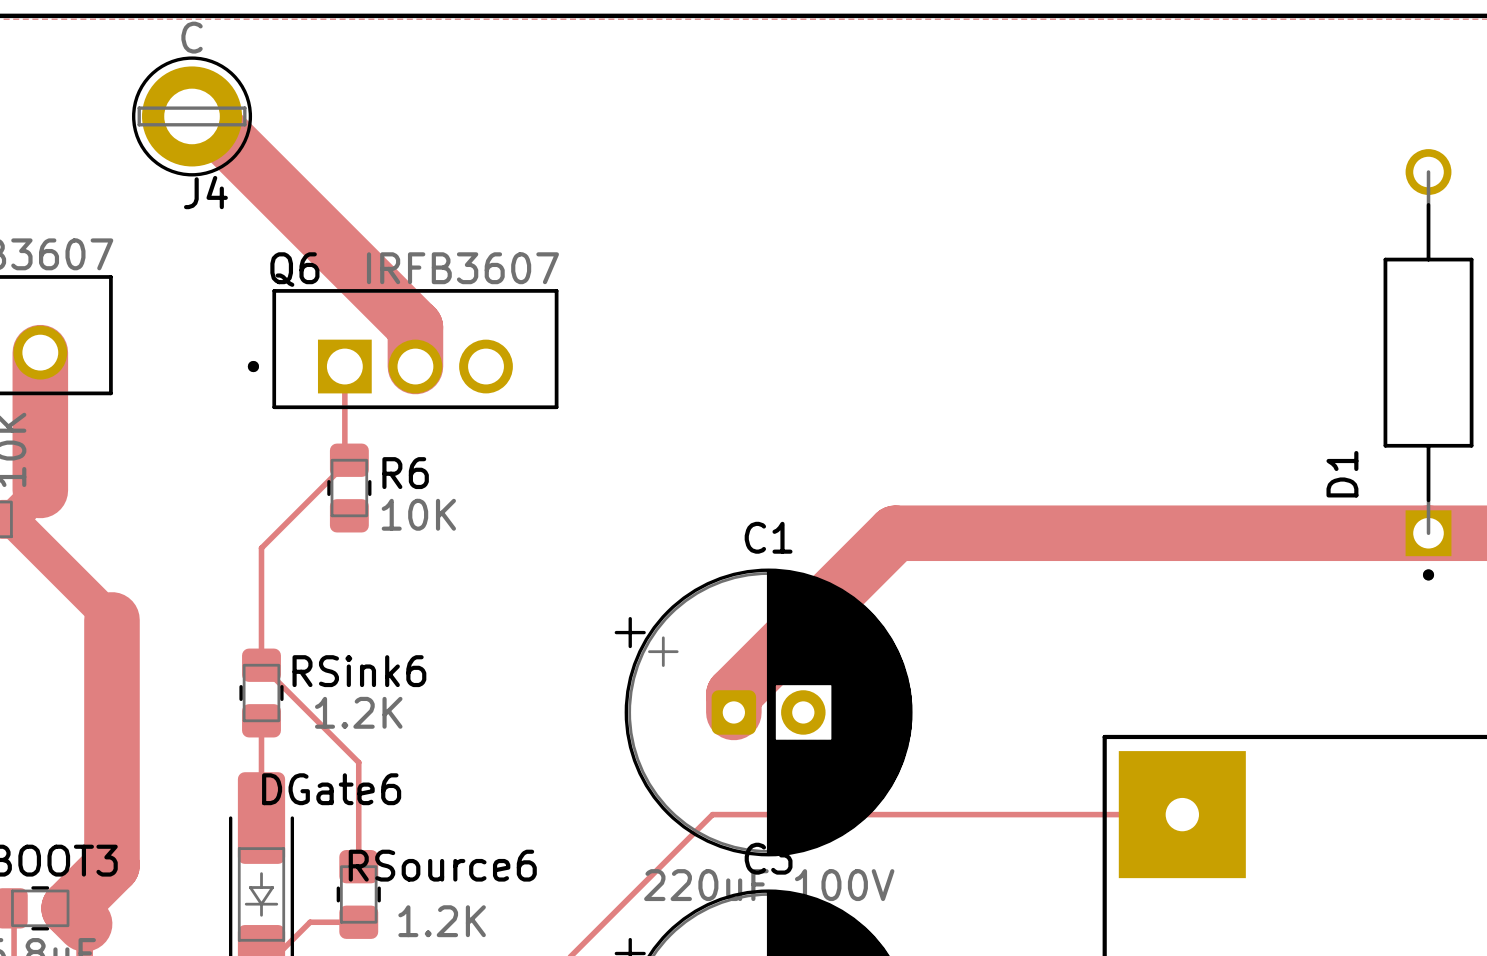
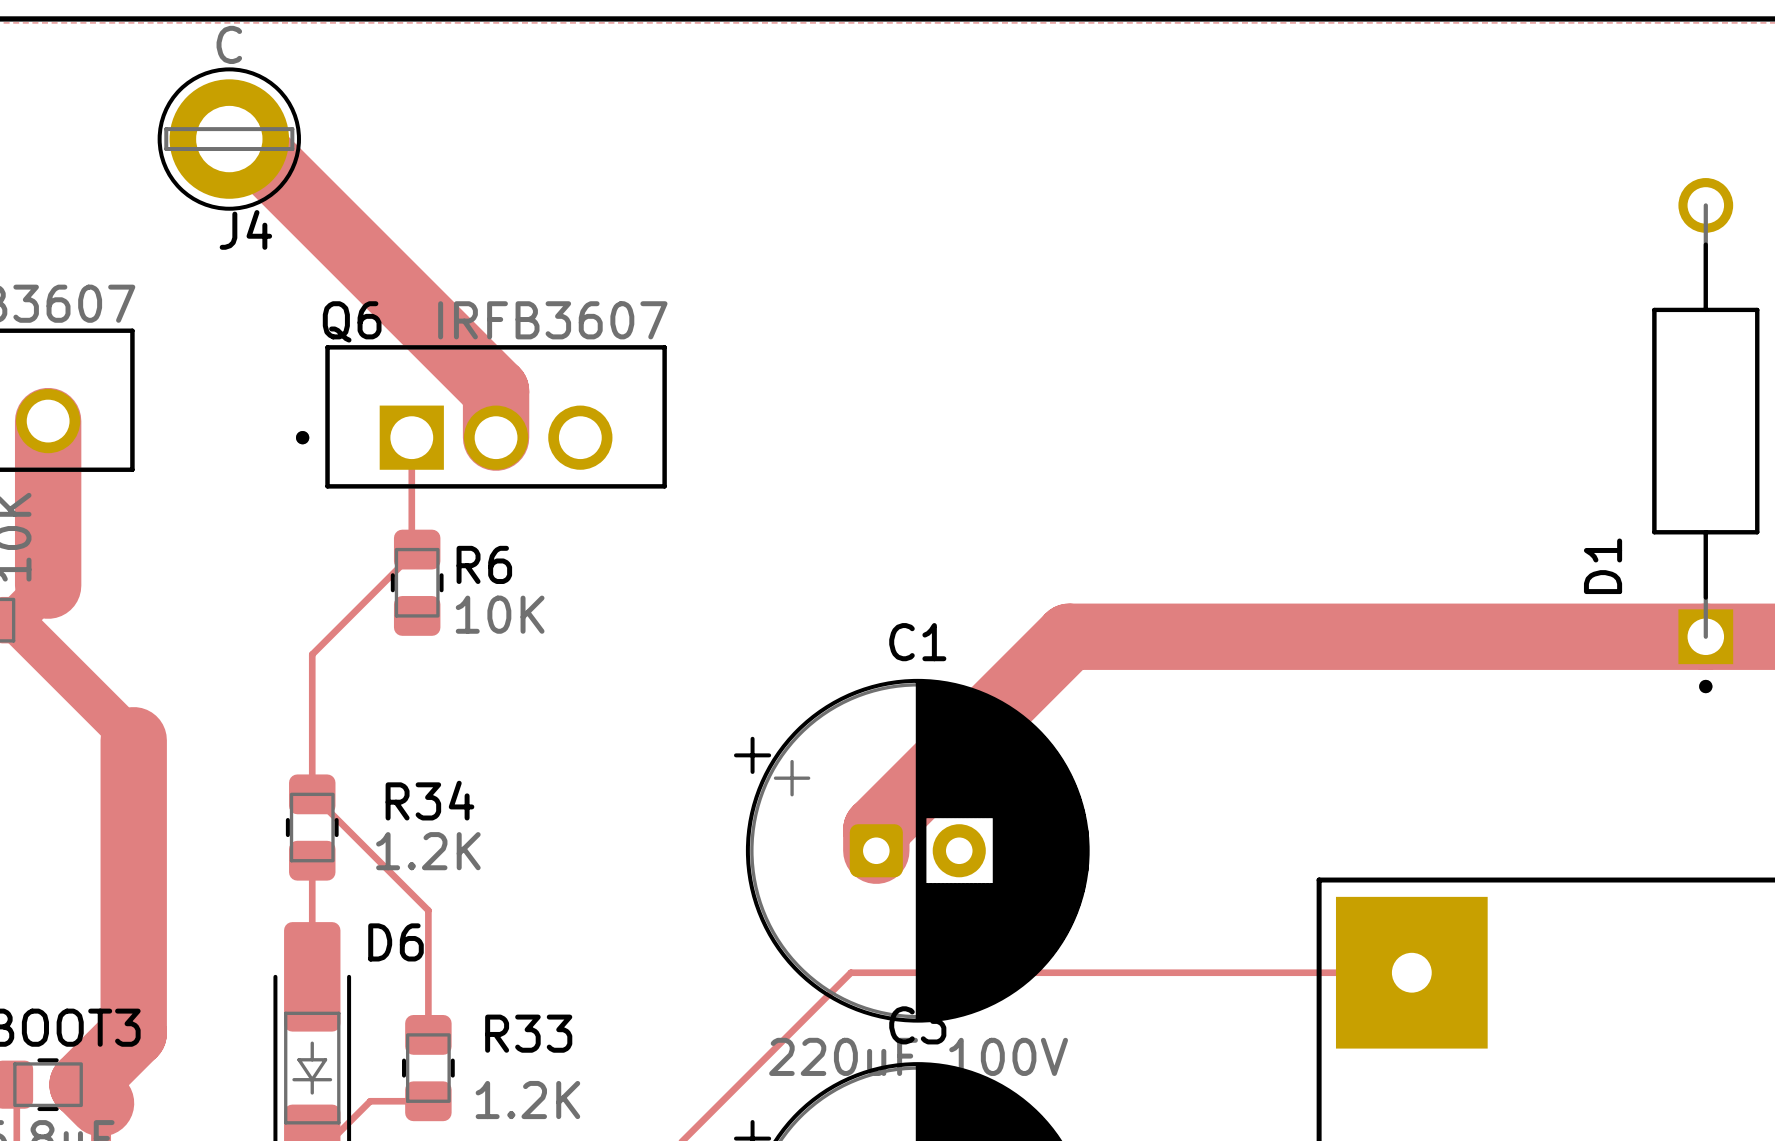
RSink6 name: RSink6 (359, 671) -> R34 (429, 800)
DGate6 name: DGate6 (331, 789) -> D6 (395, 942)
RSource6 name: RSource6 (442, 865) -> R33 (528, 1033)

